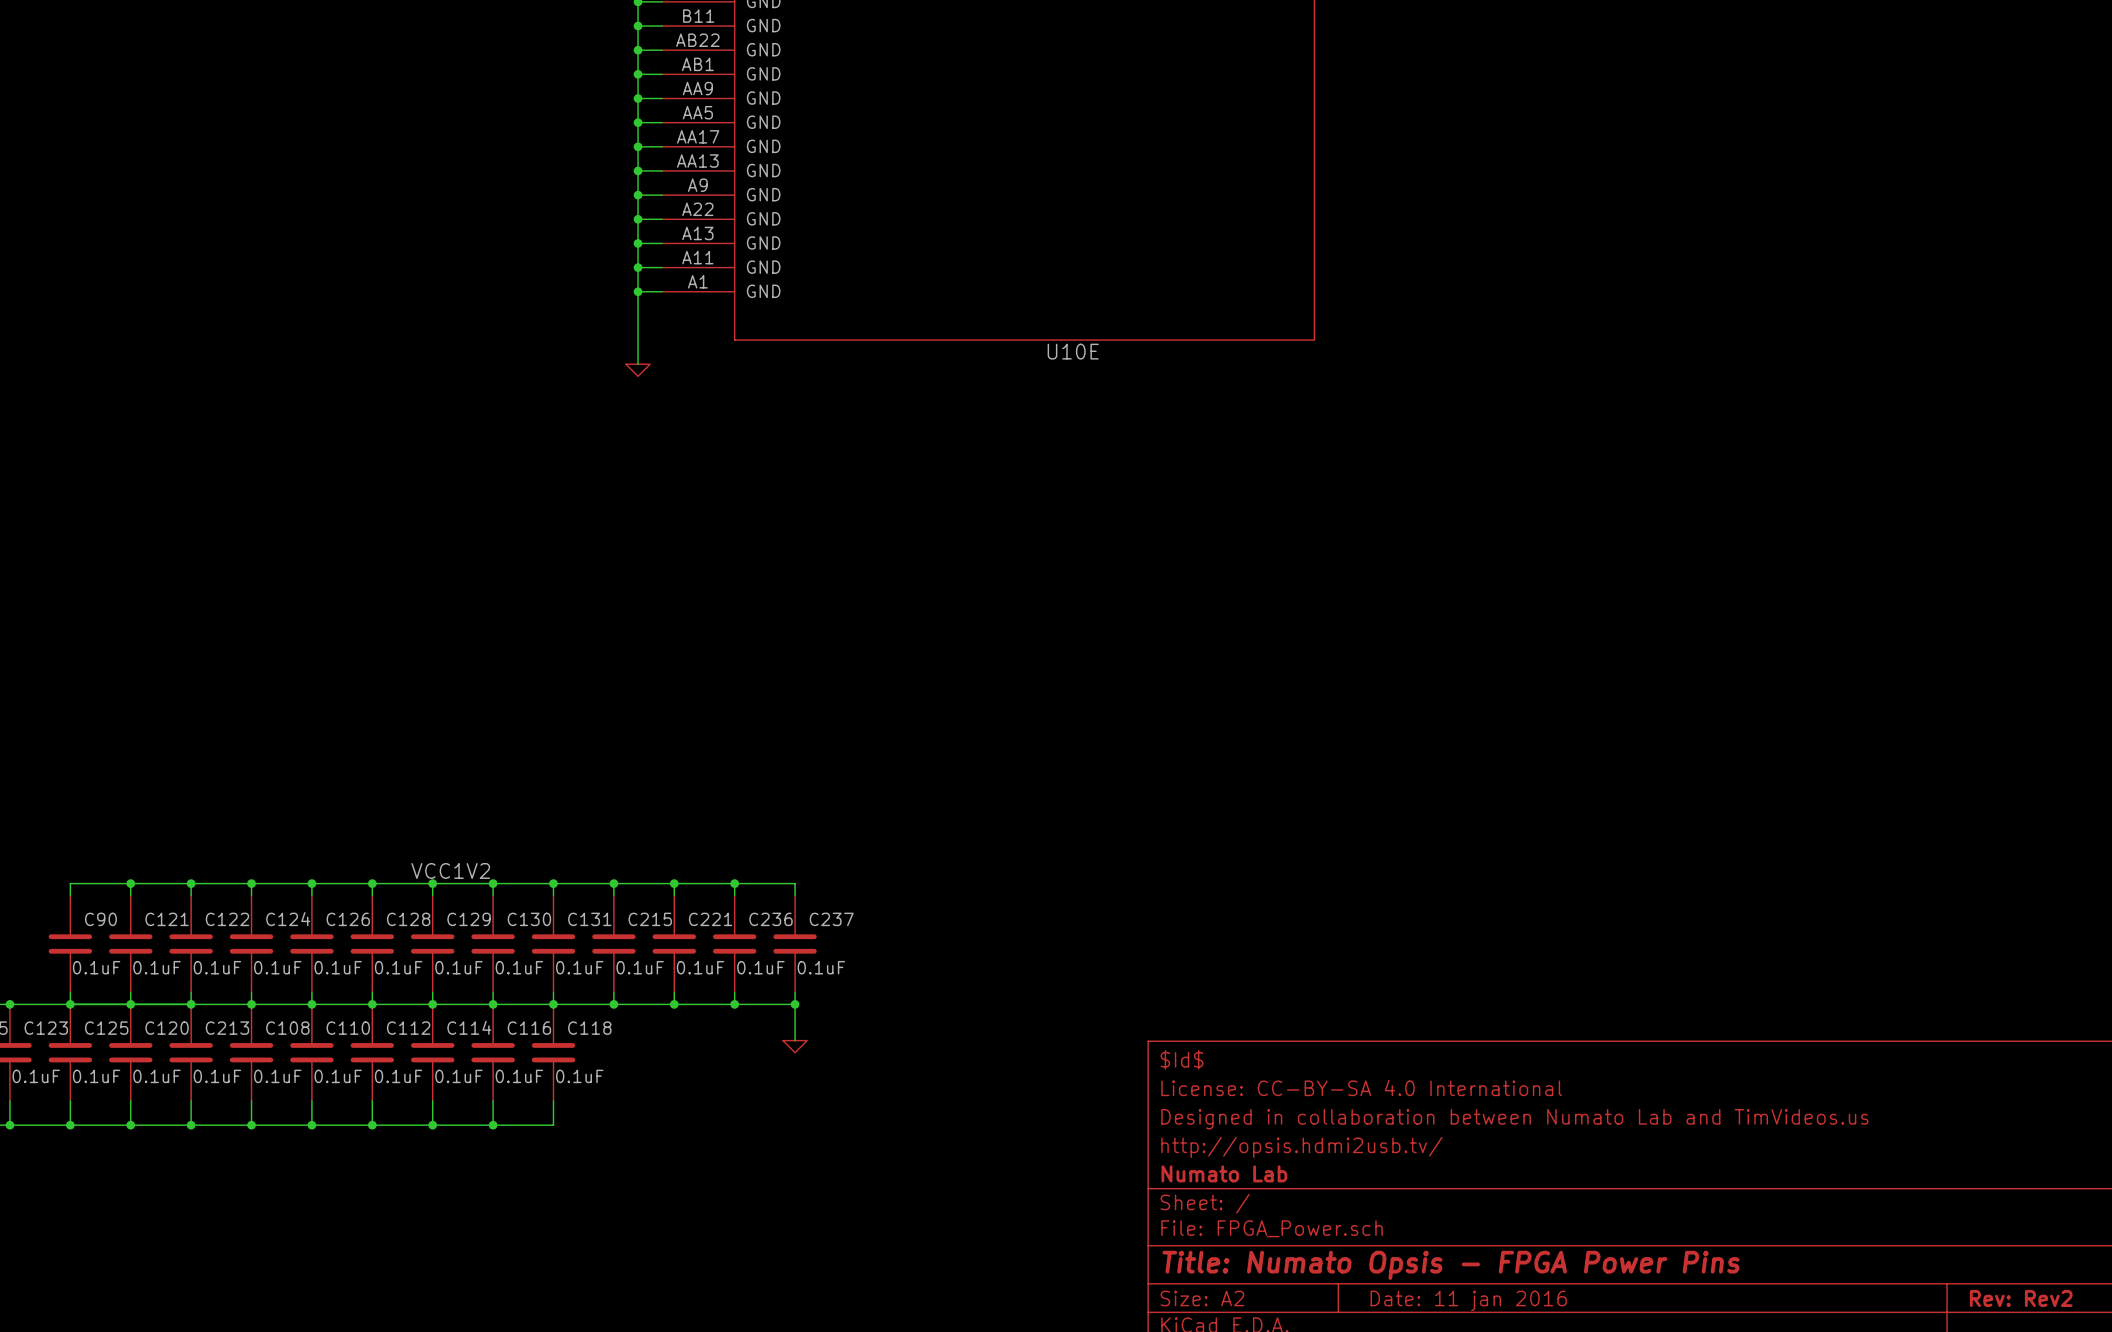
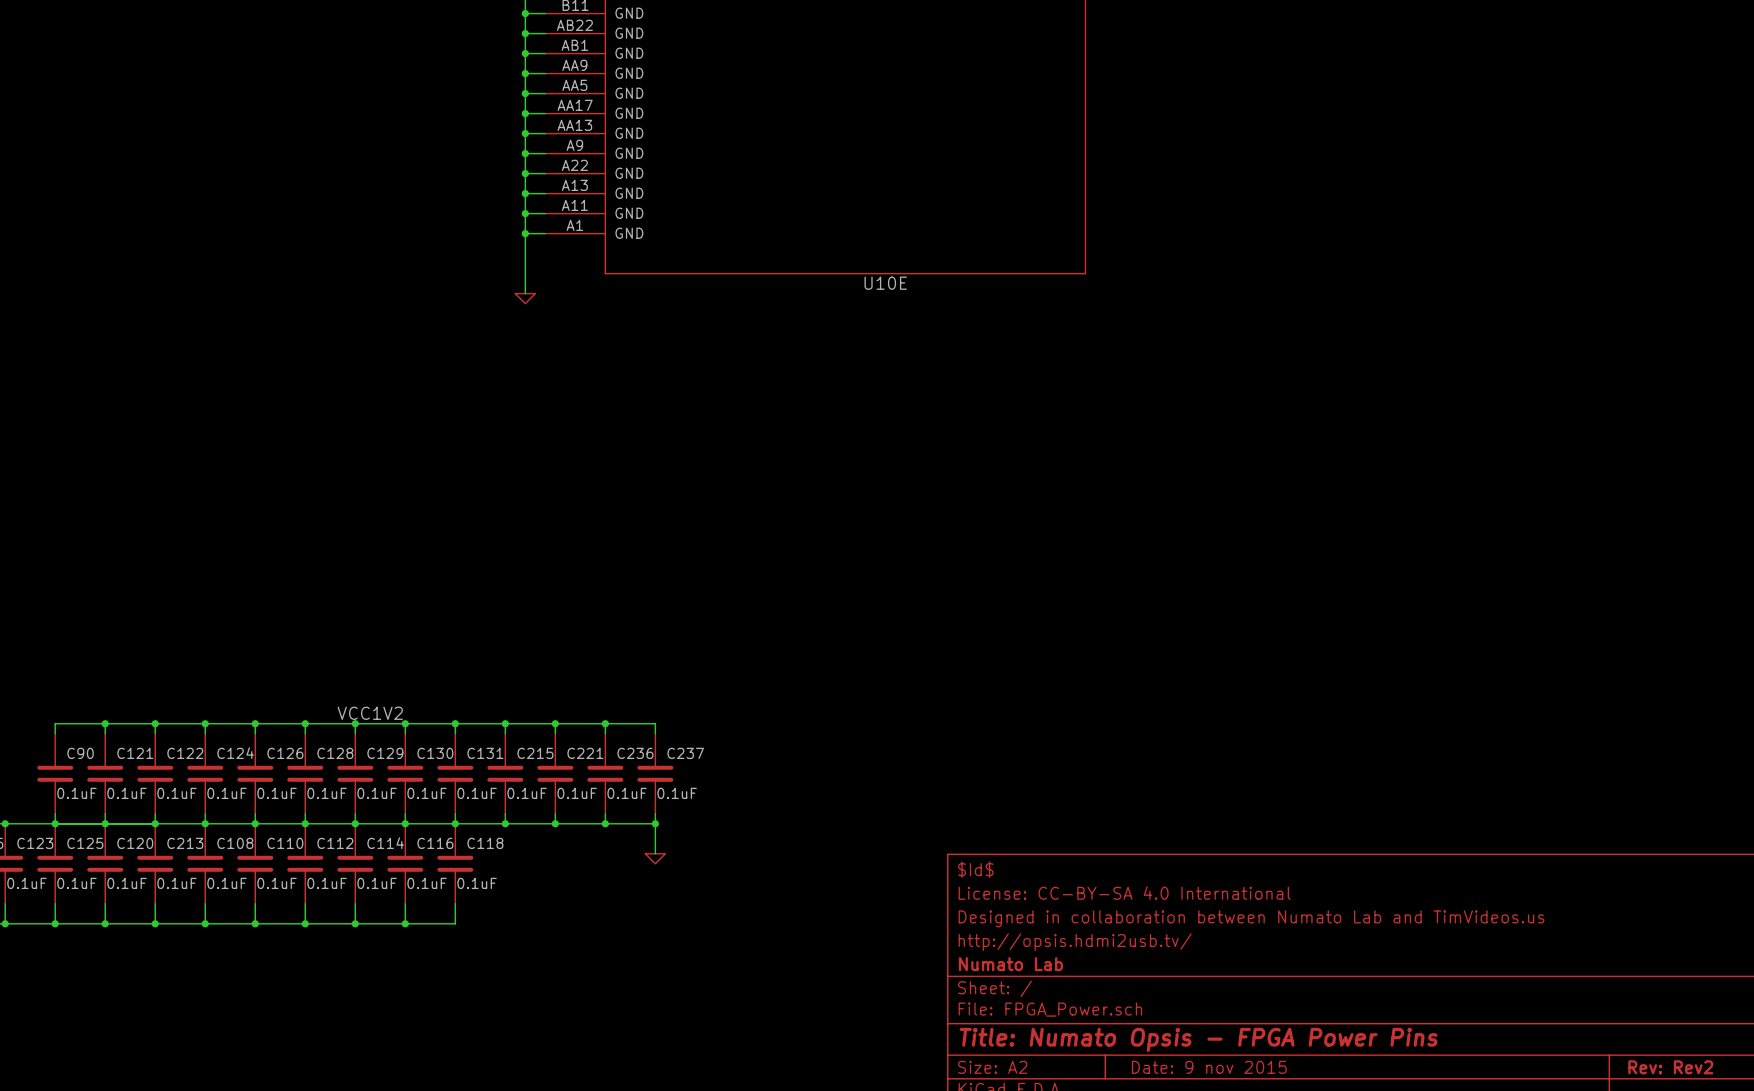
title block: Date: 11 jan 2016 (1468, 1300) -> Date: 9 nov 2015 (1209, 1067)

